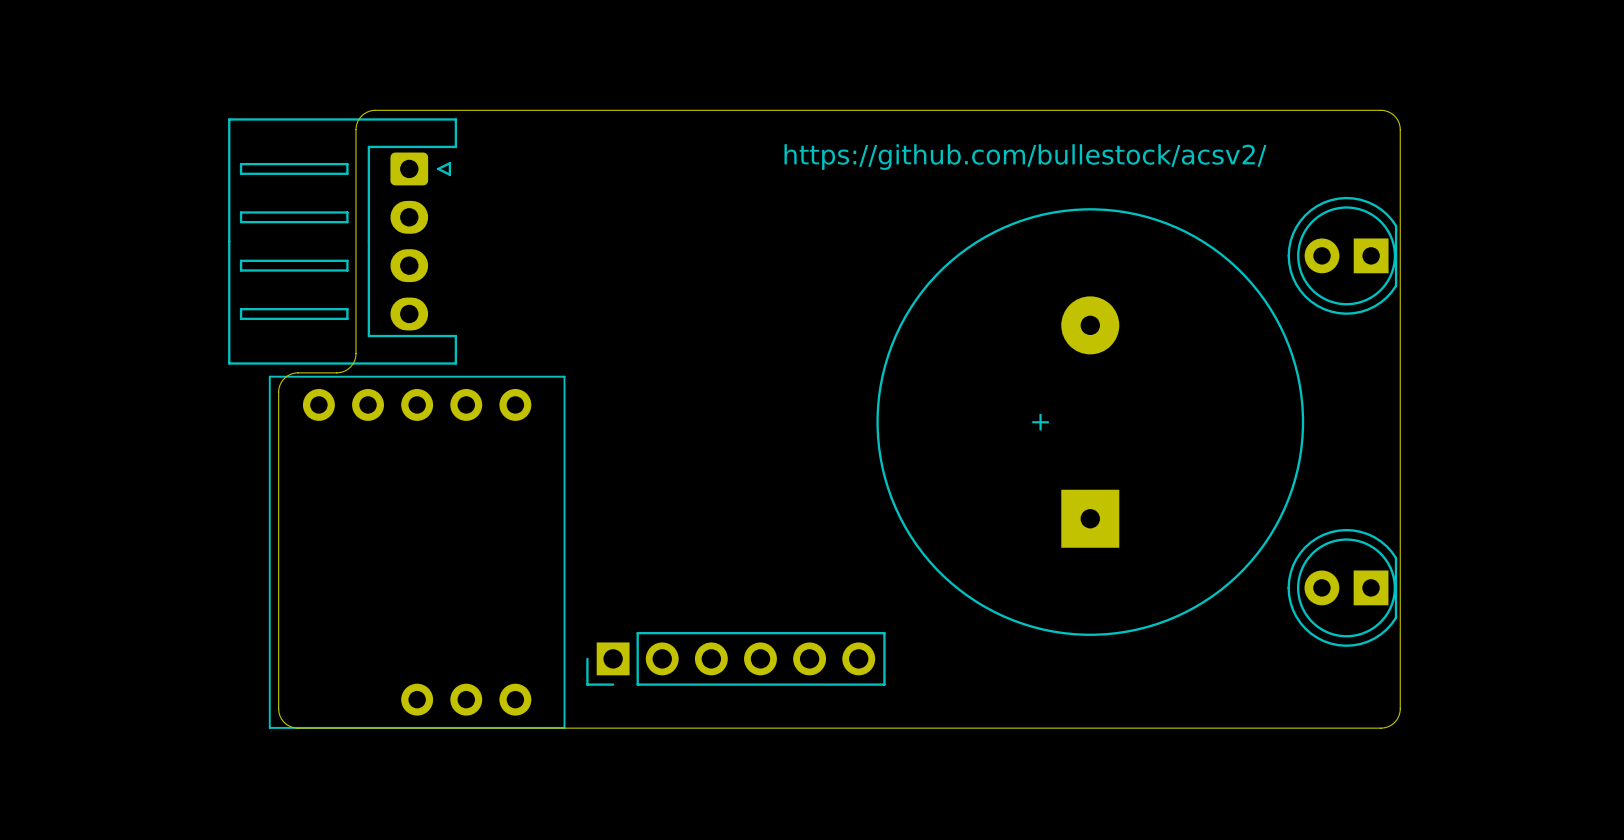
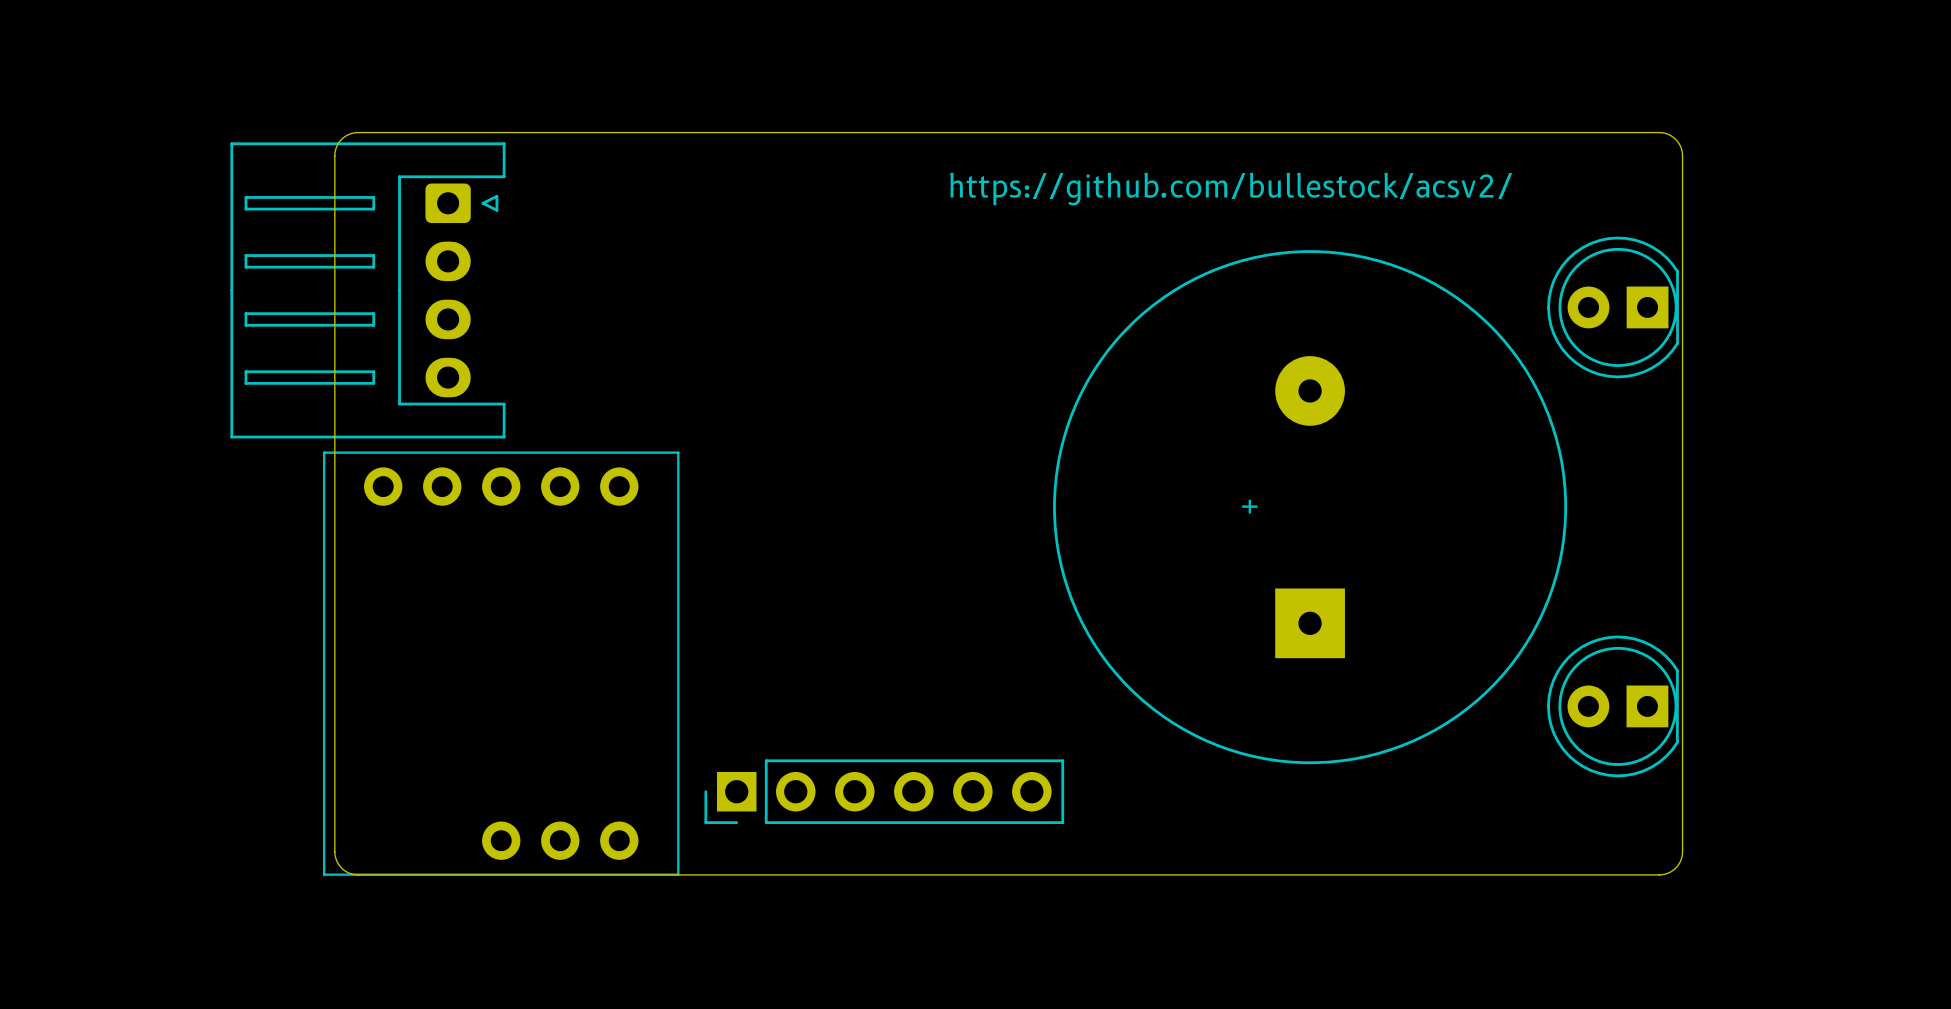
board edge: (375, 110) (363, 114) (356, 127) (354, 359) (348, 368) (340, 372) (290, 374) (282, 380) (278, 392) -> (451, 132) (355, 132) (343, 137) (336, 148) (334, 471)
part position: (342, 241) -> (367, 290)

